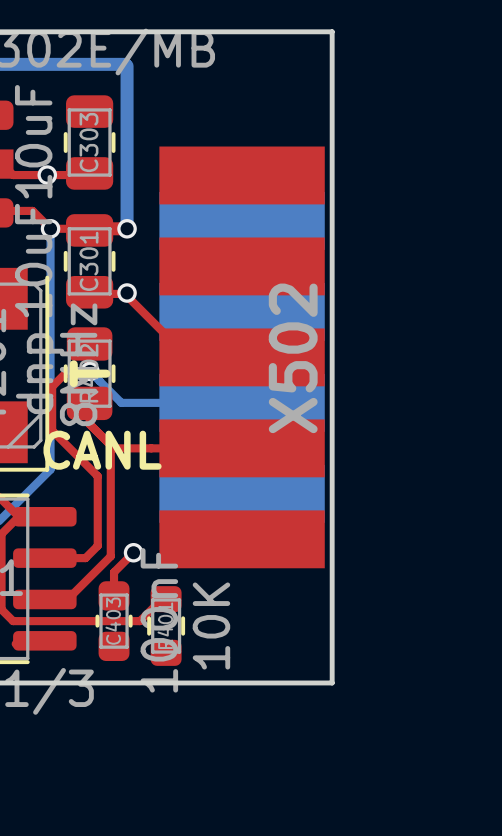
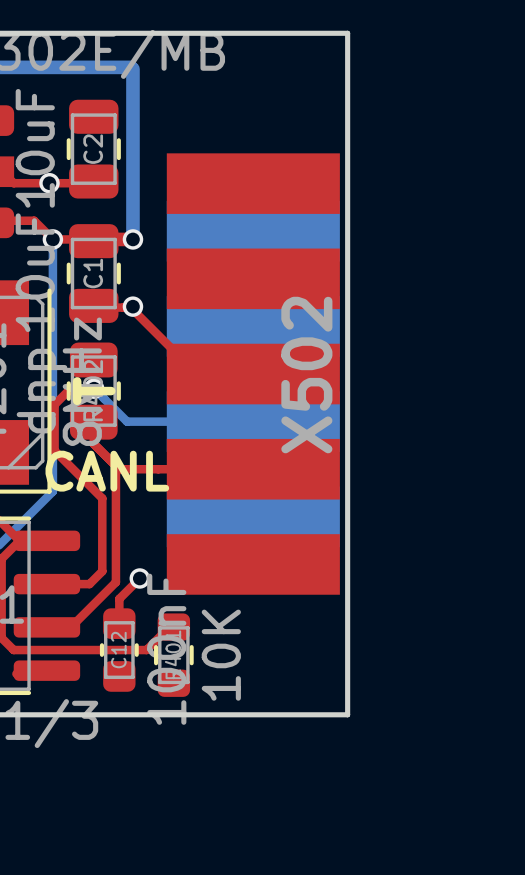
C303 name: C303 (89, 142) -> C2 (93, 149)
C301 name: C301 (89, 261) -> C1 (93, 273)
C403 name: C403 (113, 621) -> C12 (118, 650)

